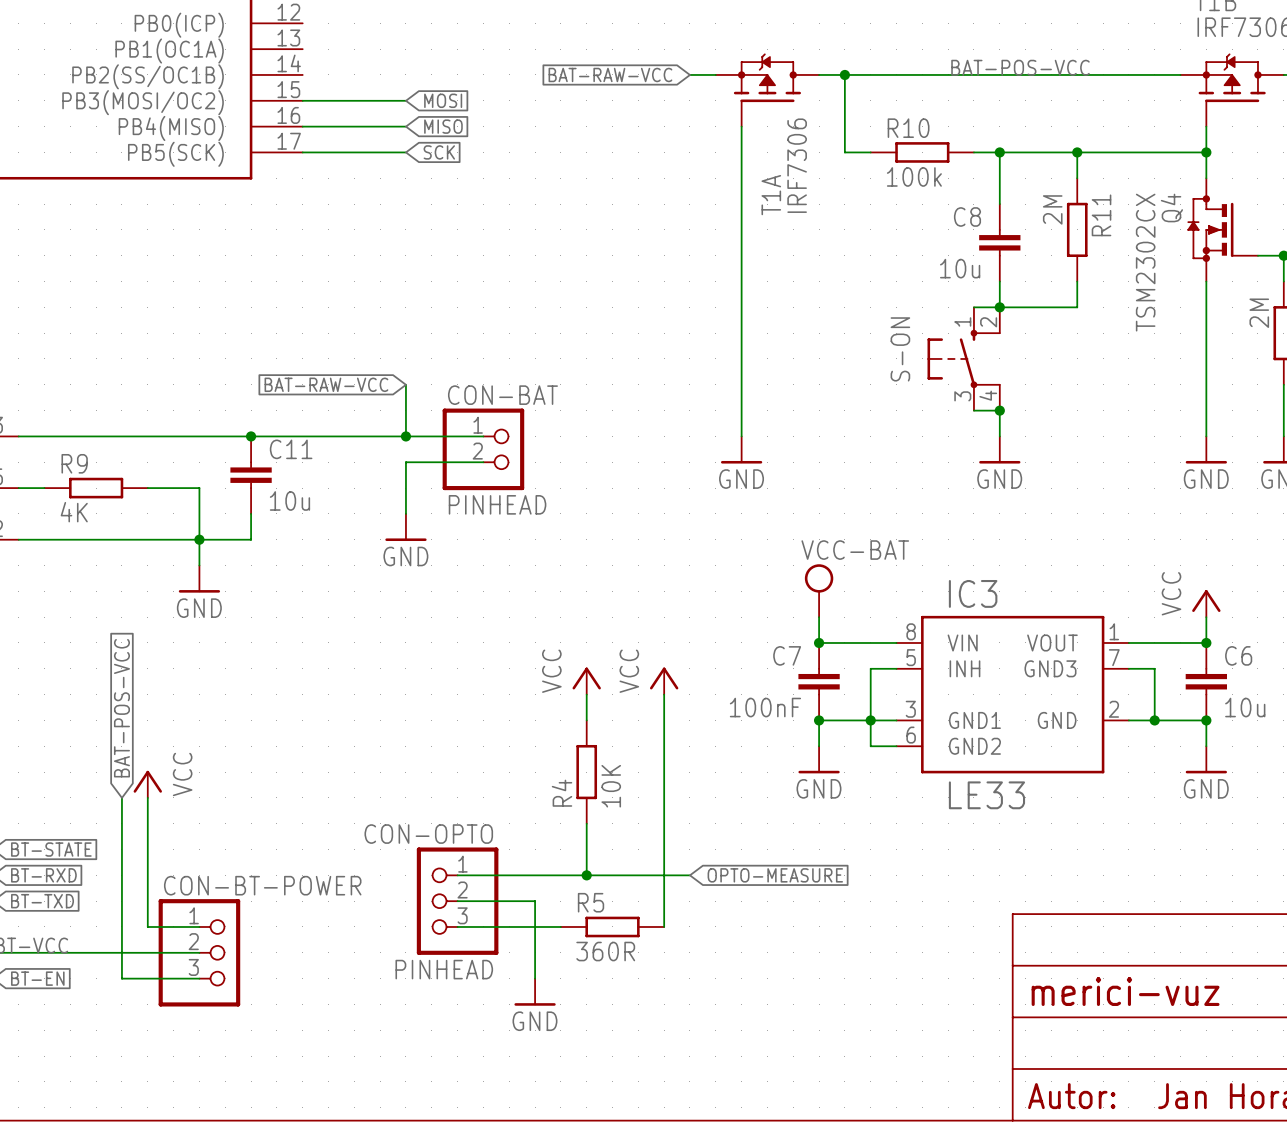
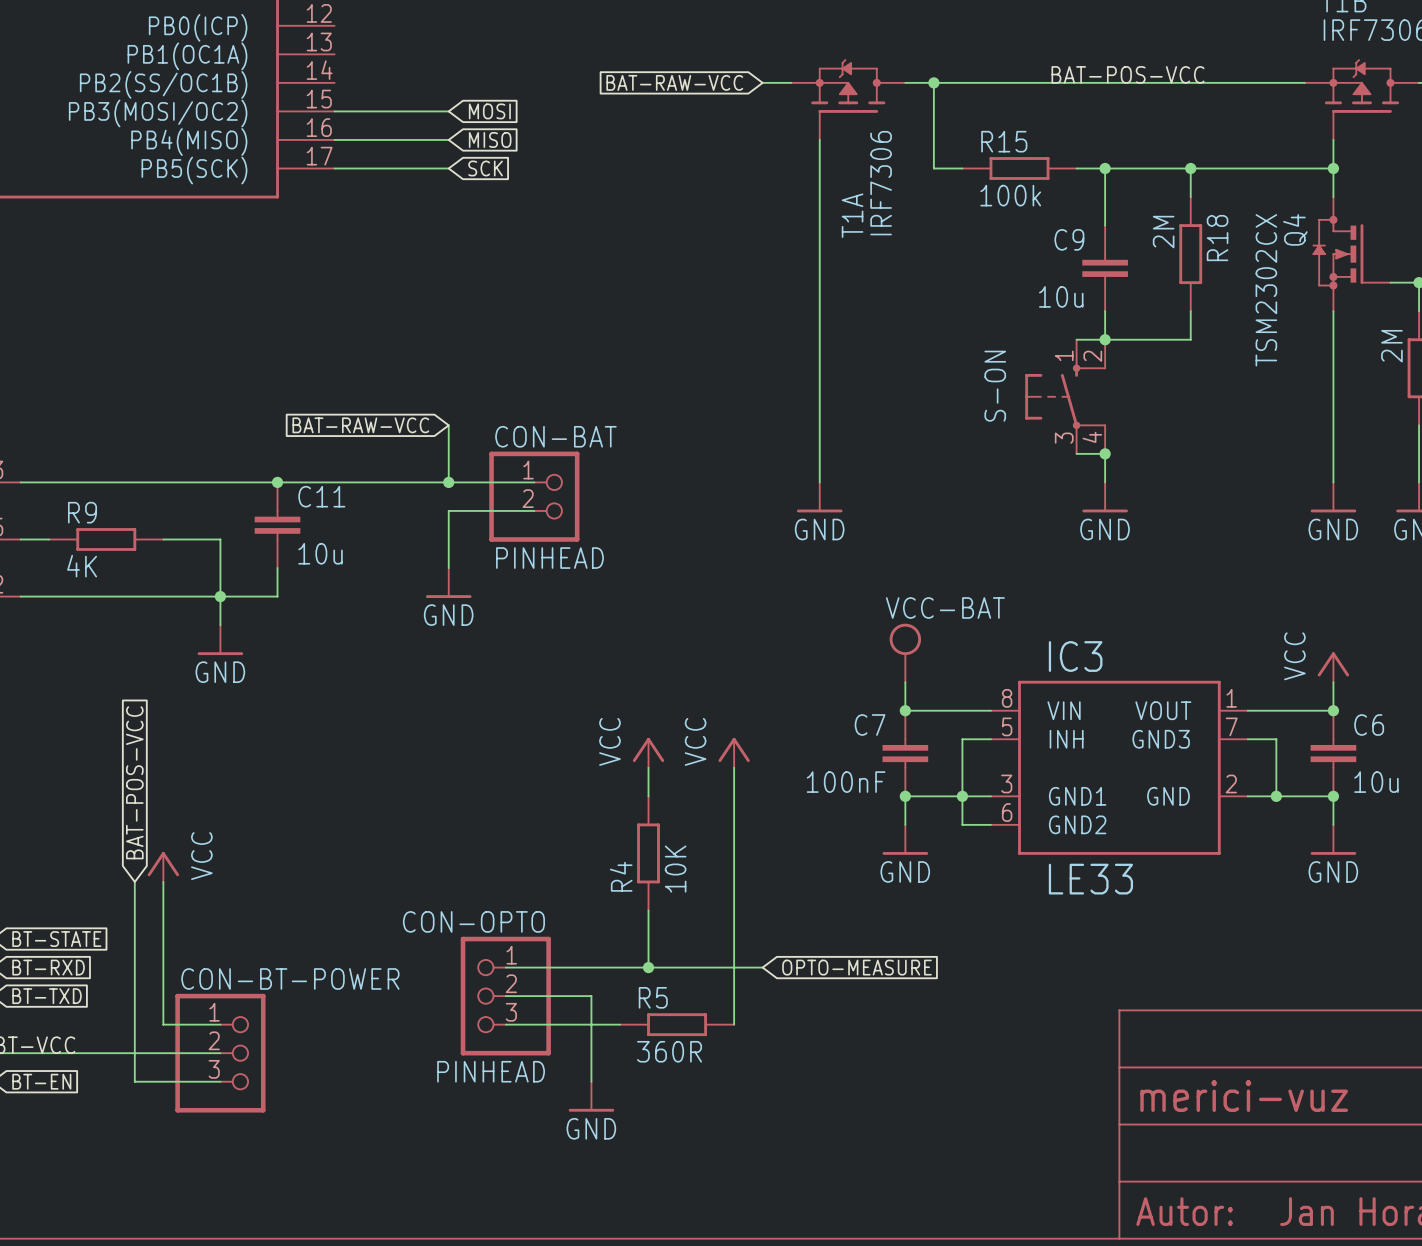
R10 name: R10 (908, 128) -> R15 (1004, 141)
R11 name: R11 (1101, 215) -> R18 (1217, 238)
C8 name: C8 (967, 216) -> C9 (1069, 239)

